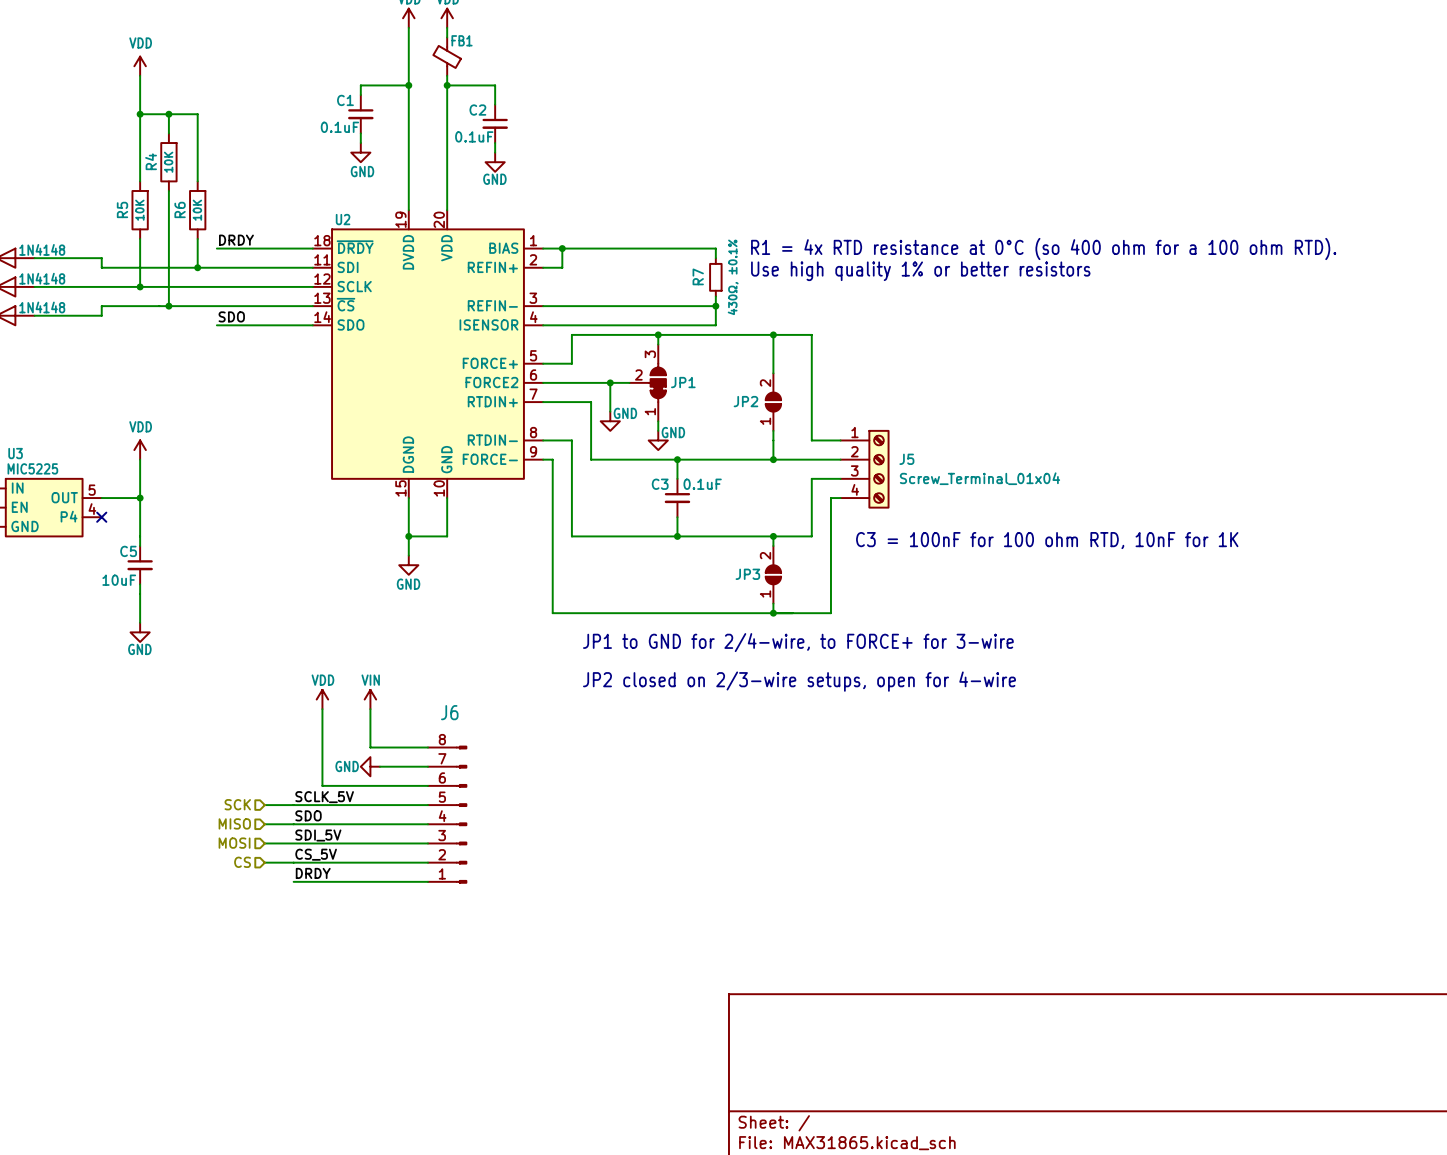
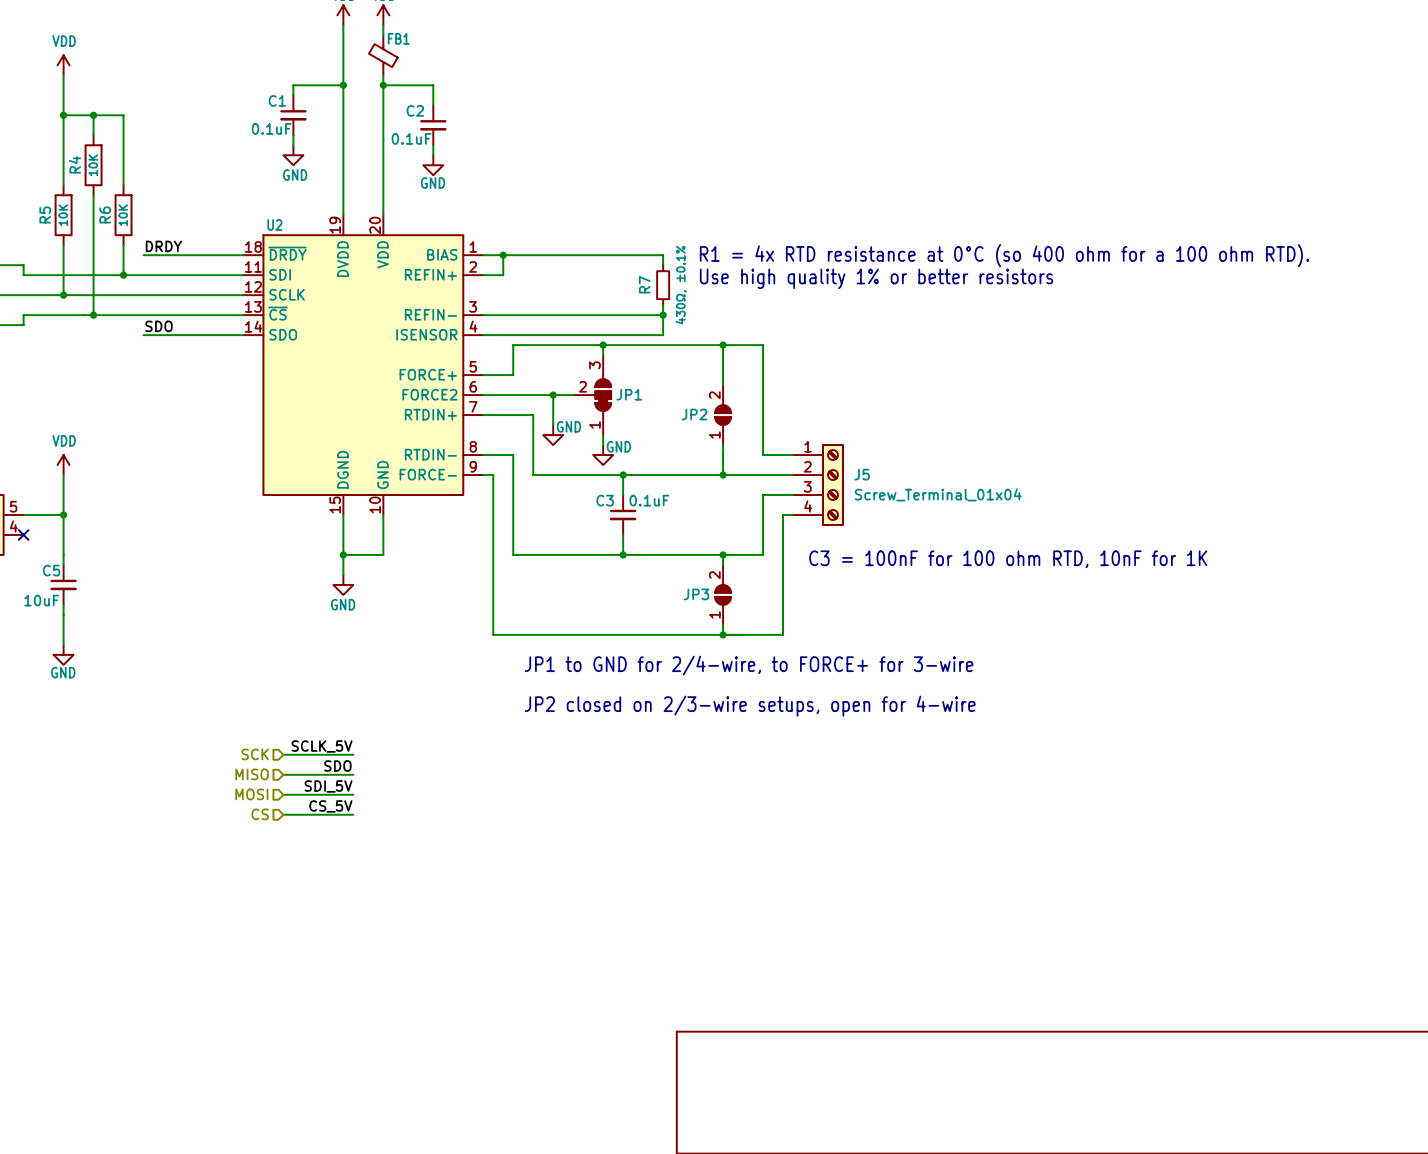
power symbol: VDD (322, 699) -> none
power symbol: VIN (370, 699) -> none
wire: (322, 709) (322, 785) (351, 785) -> none
wire: (370, 709) (370, 747) -> (283, 774) (303, 774)
wire: none -> (283, 754) (353, 754)
wire: (418, 747) (427, 747) -> none
power symbol: GND (370, 766) -> none
wire: (418, 766) (427, 766) -> none
wire: (418, 785) (427, 785) -> none
label position: SCLK_5V (324, 797) -> SCLK_5V (322, 746)
hierarchical label position: SCK (237, 804) -> SCK (255, 754)
wire: (264, 805) (427, 805) -> none
J6: (447, 814) -> none
label position: SDO (308, 815) -> SDO (337, 766)
hierarchical label position: MISO (234, 823) -> MISO (252, 774)
wire: (264, 824) (427, 824) -> none
label position: SDI_5V (318, 835) -> SDI_5V (328, 786)
hierarchical label position: MOSI (234, 843) -> MOSI (251, 794)
wire: (264, 843) (427, 843) -> none
label position: CS_5V (316, 854) -> CS_5V (330, 806)
hierarchical label position: CS (242, 862) -> CS (260, 814)
wire: (264, 862) (427, 862) -> none
label: DRDY (313, 873) -> none
wire: (293, 881) (427, 881) -> none

